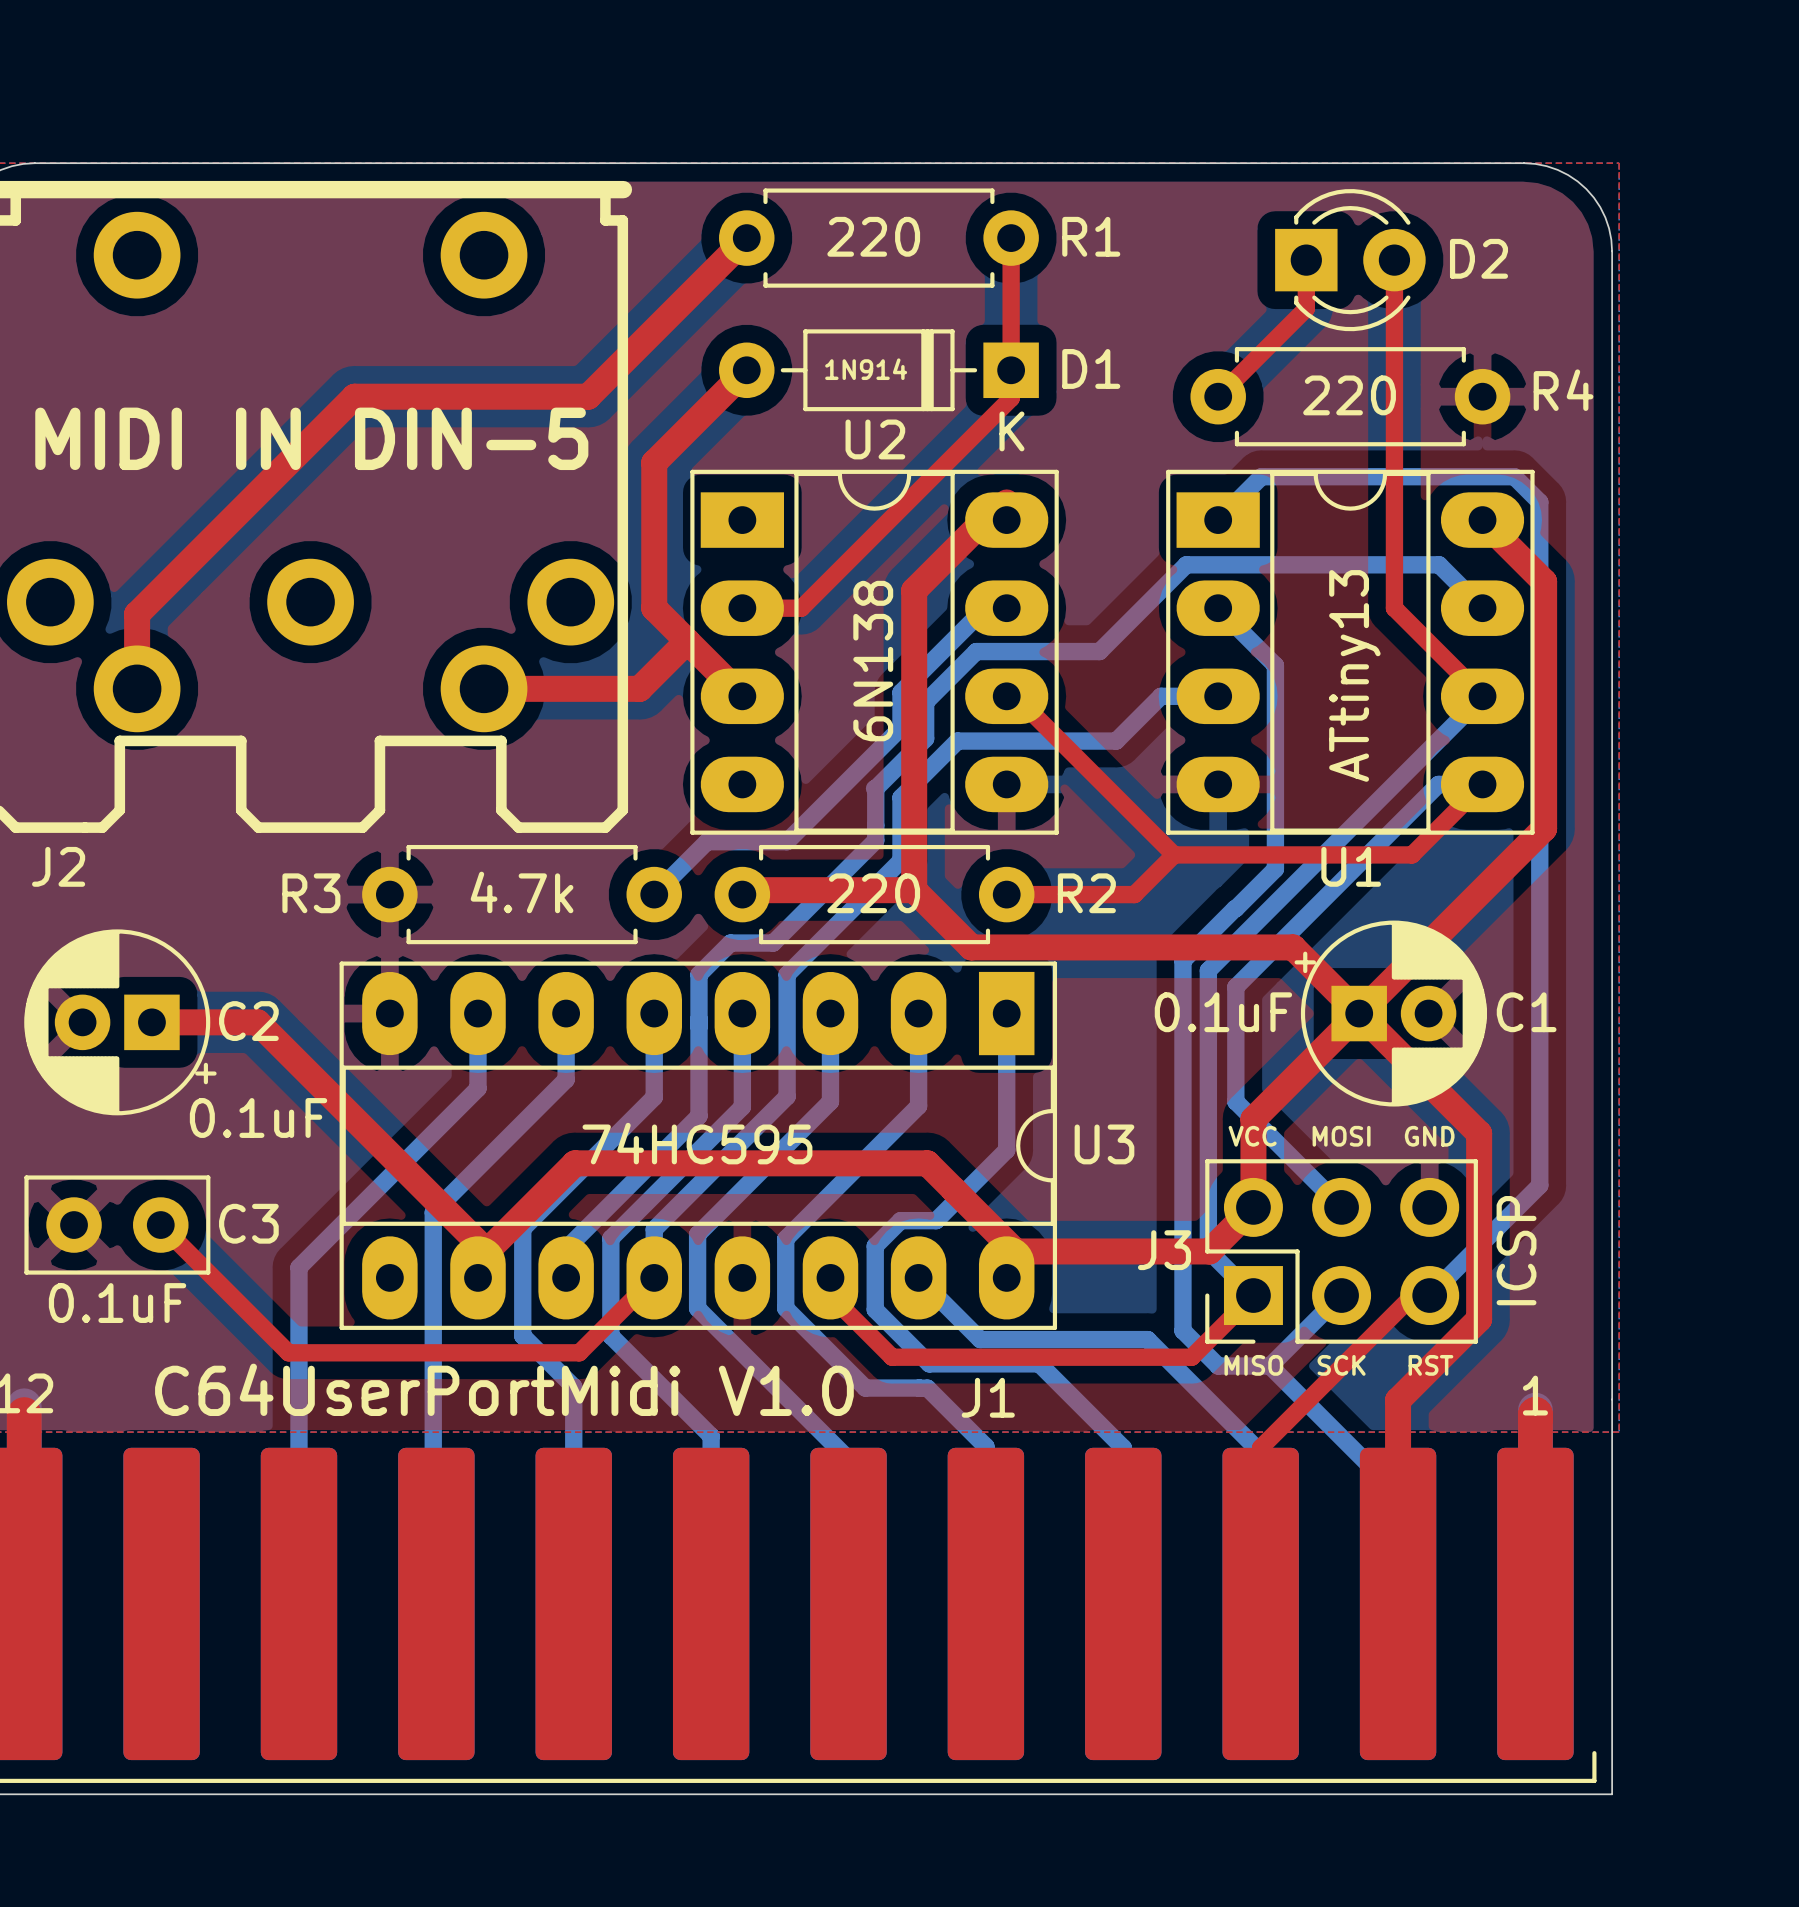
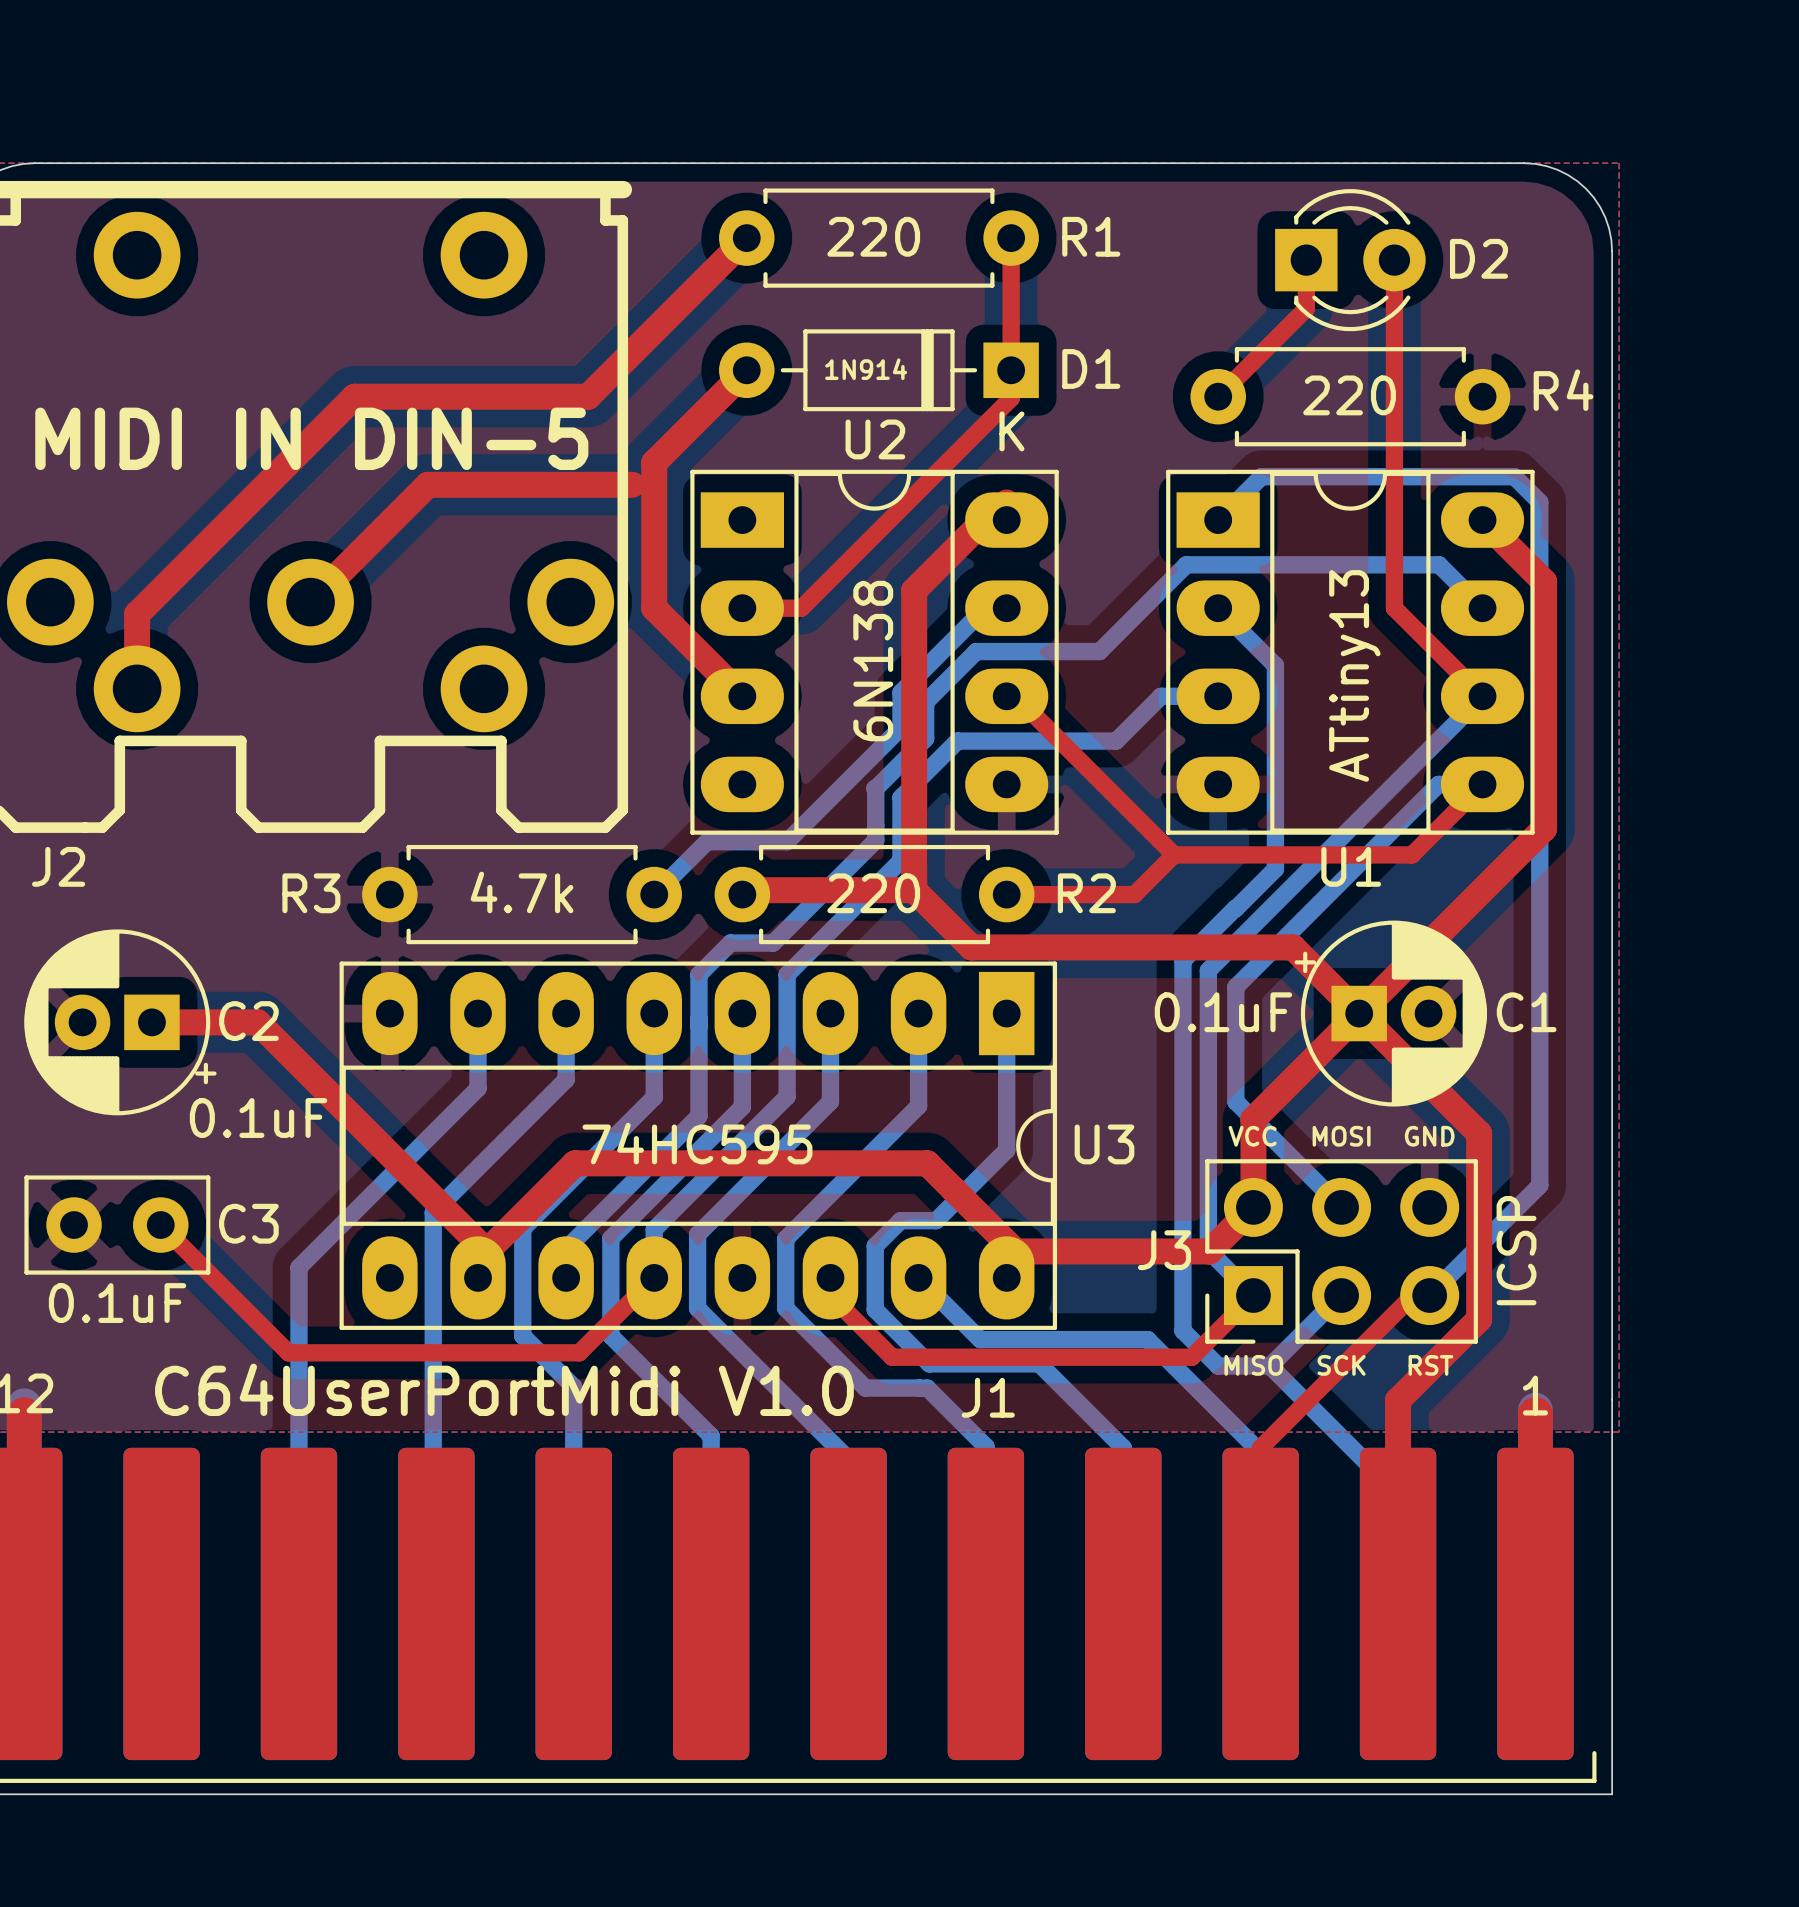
top track: none -> (632, 484) (427, 484) (310, 602)
top track: (687, 641) (639, 688) (484, 688) -> none

